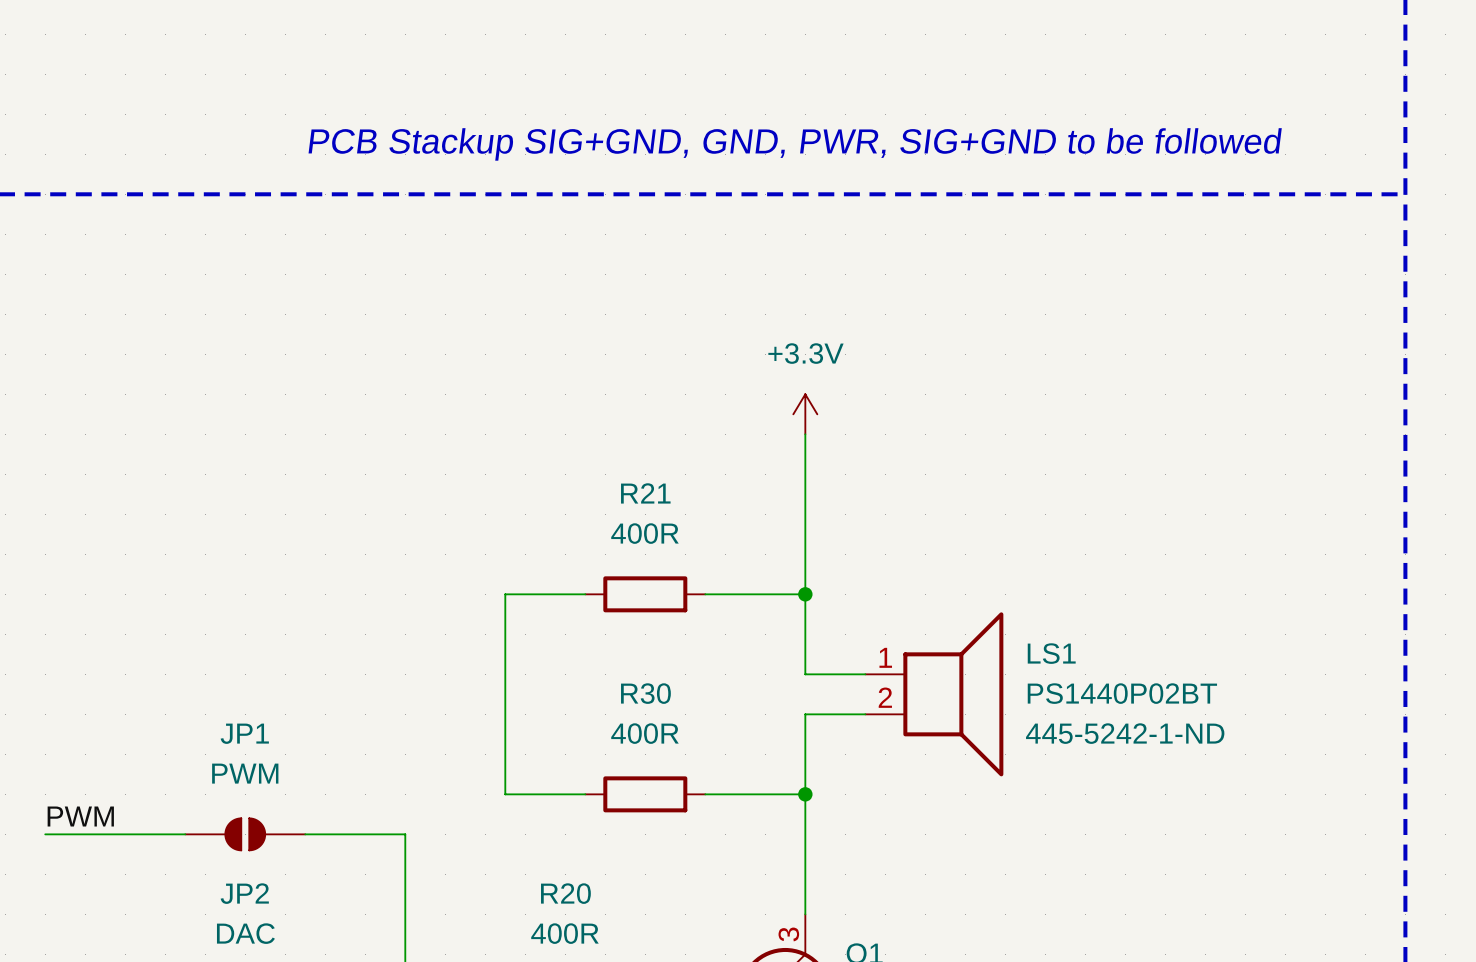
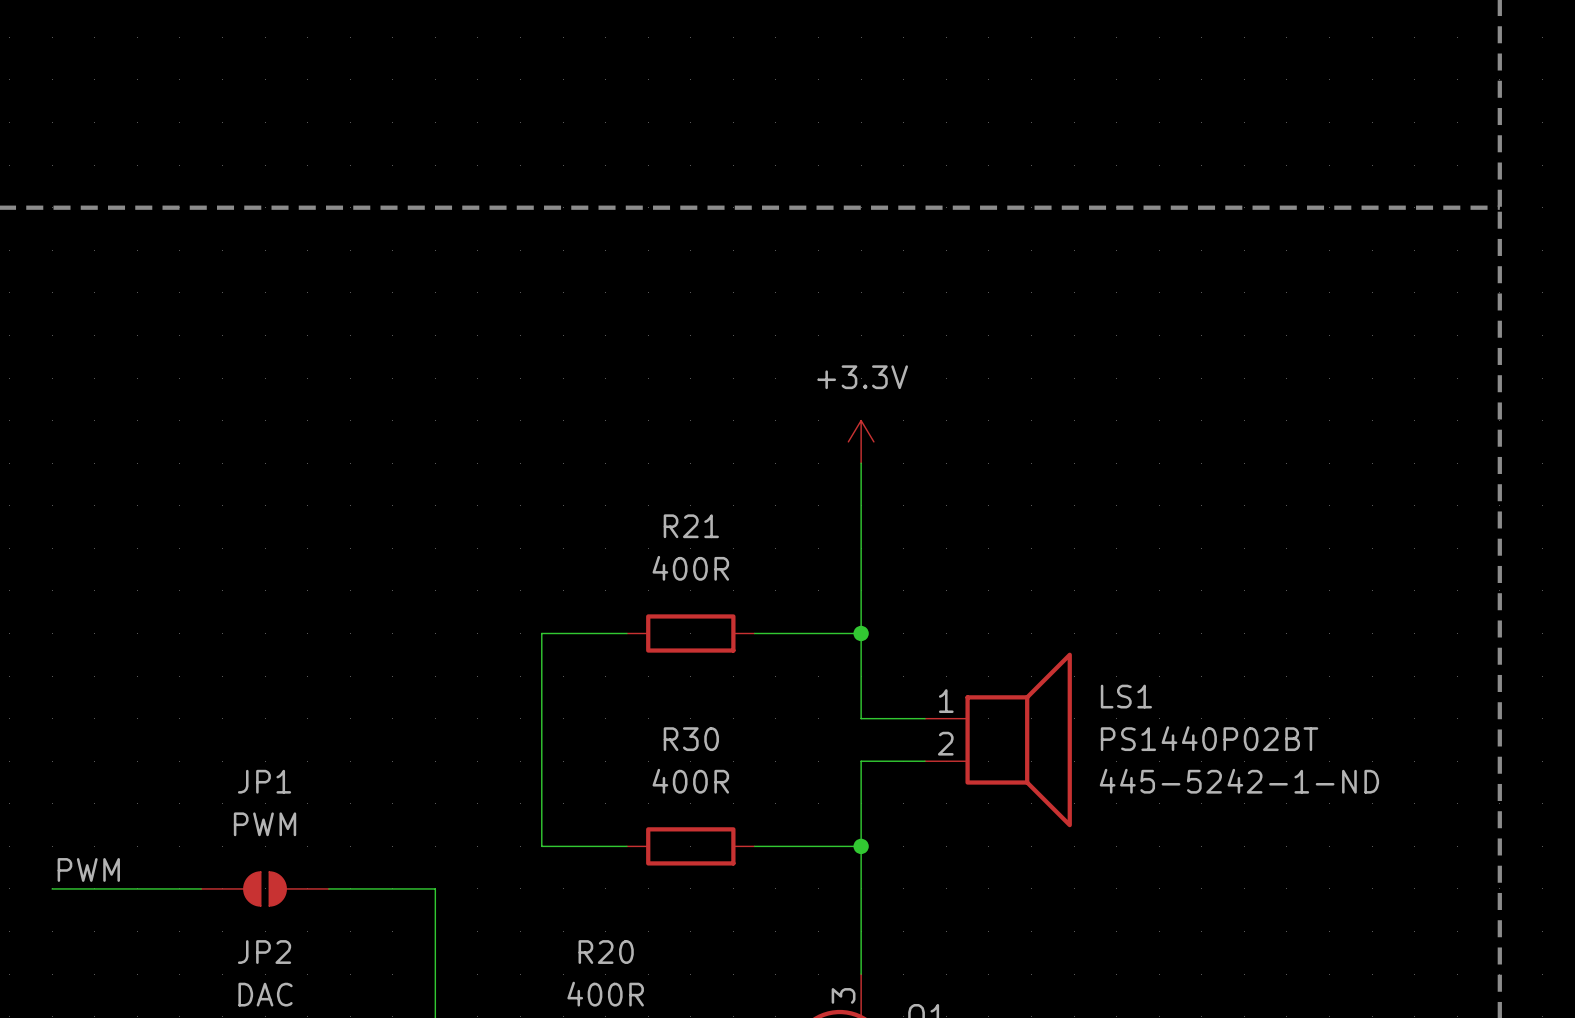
text: PCB Stackup SIG+GND, GND, PWR, SIG+GND to be followed (795, 144) -> none

